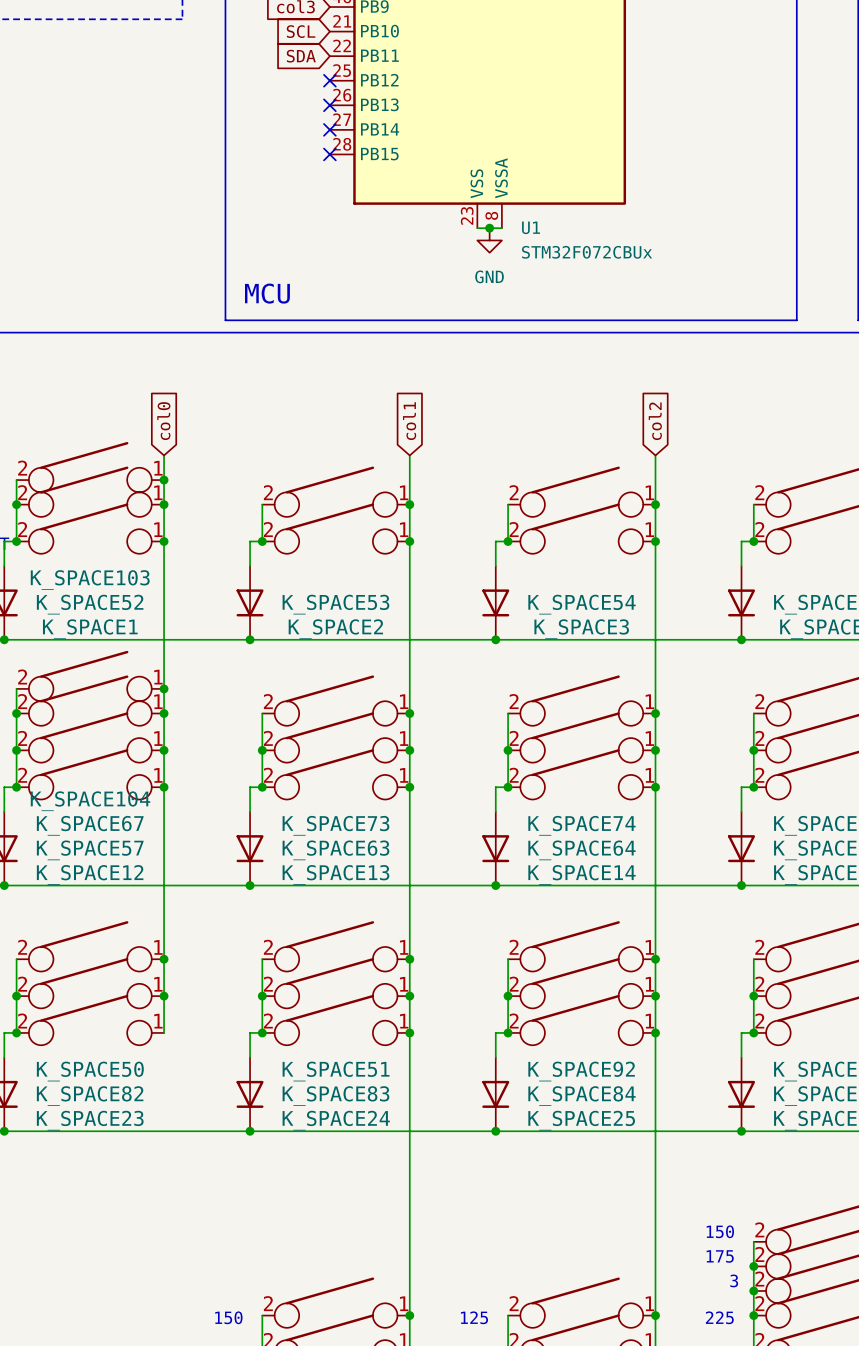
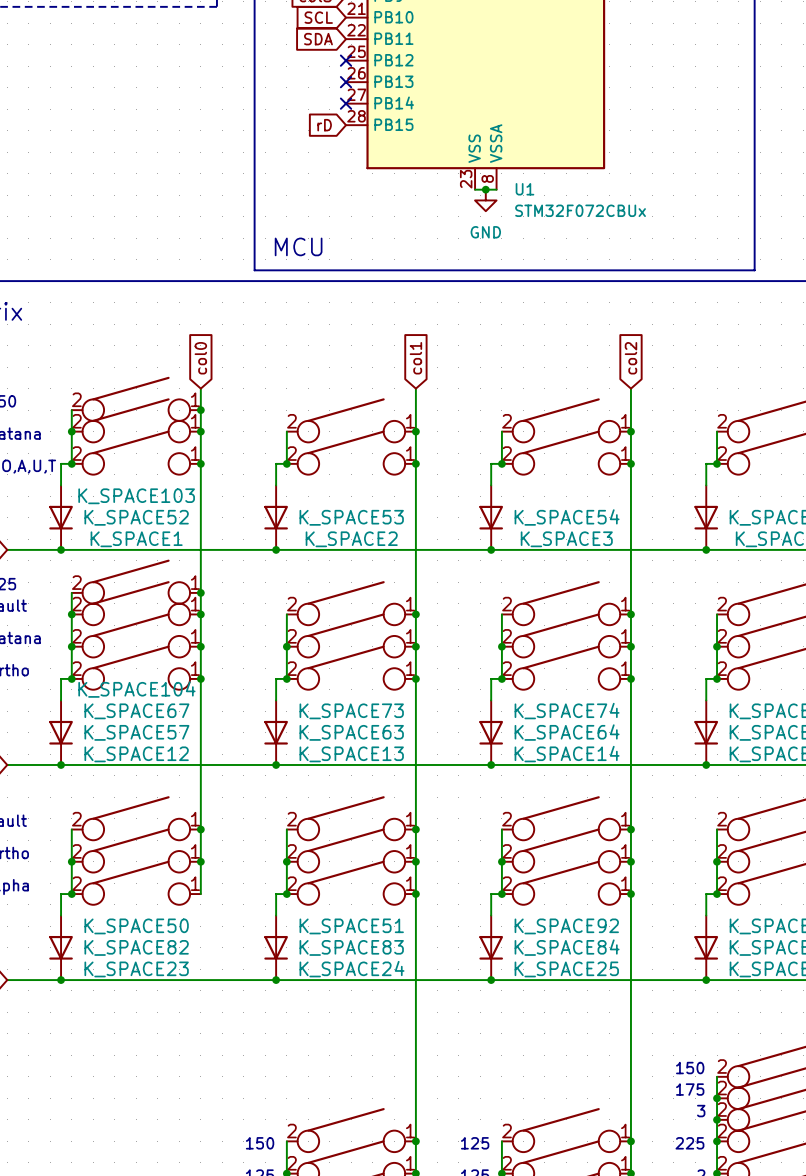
global label: none -> rD (324, 125)
no-connect mark: (329, 154) -> none

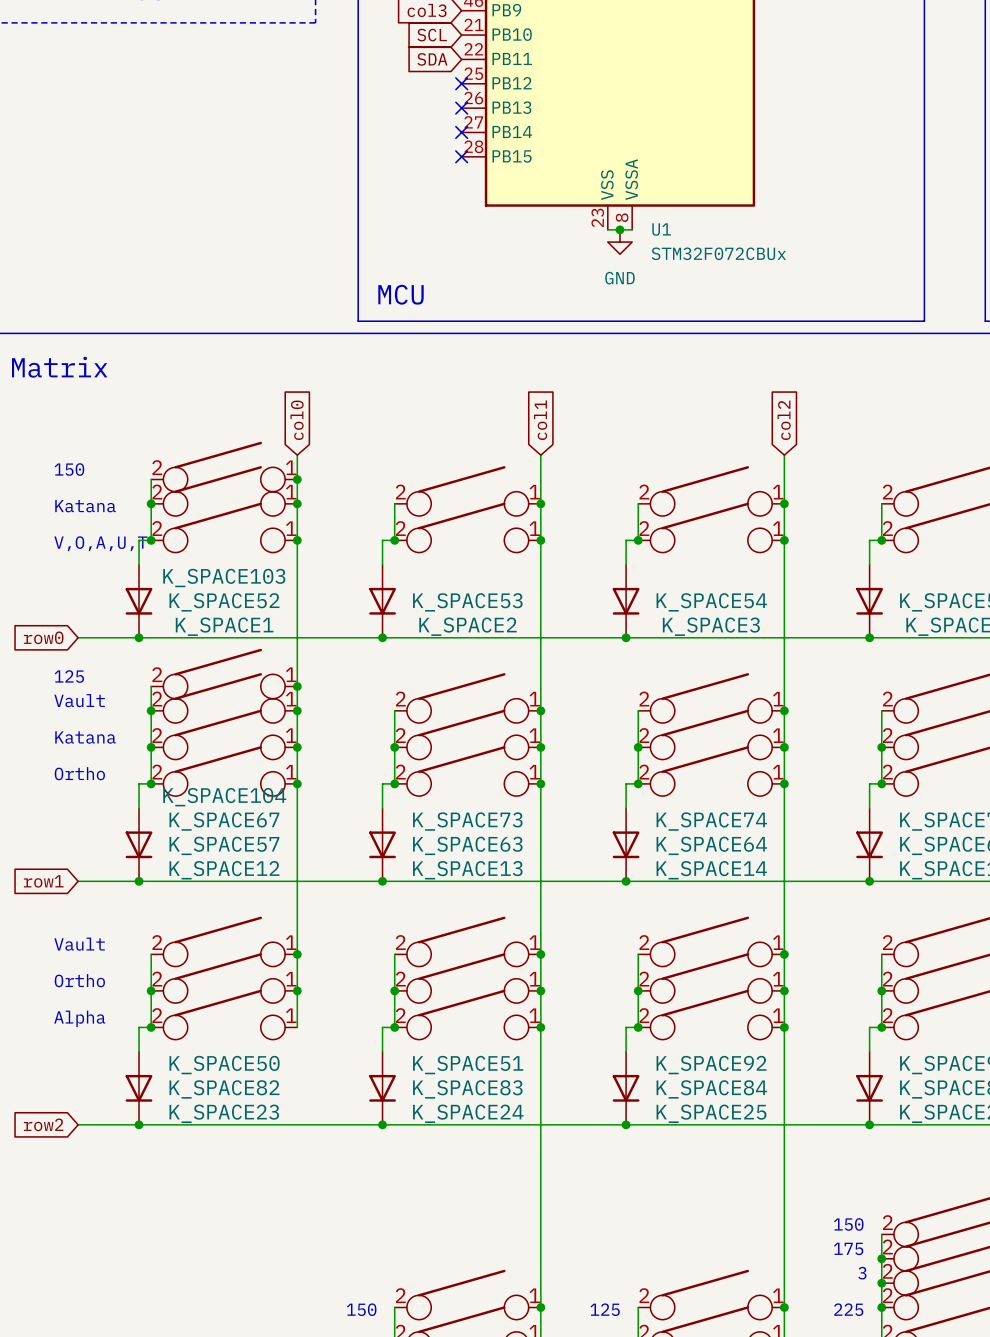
global label: rD (324, 125) -> none
no-connect mark: none -> (461, 156)

